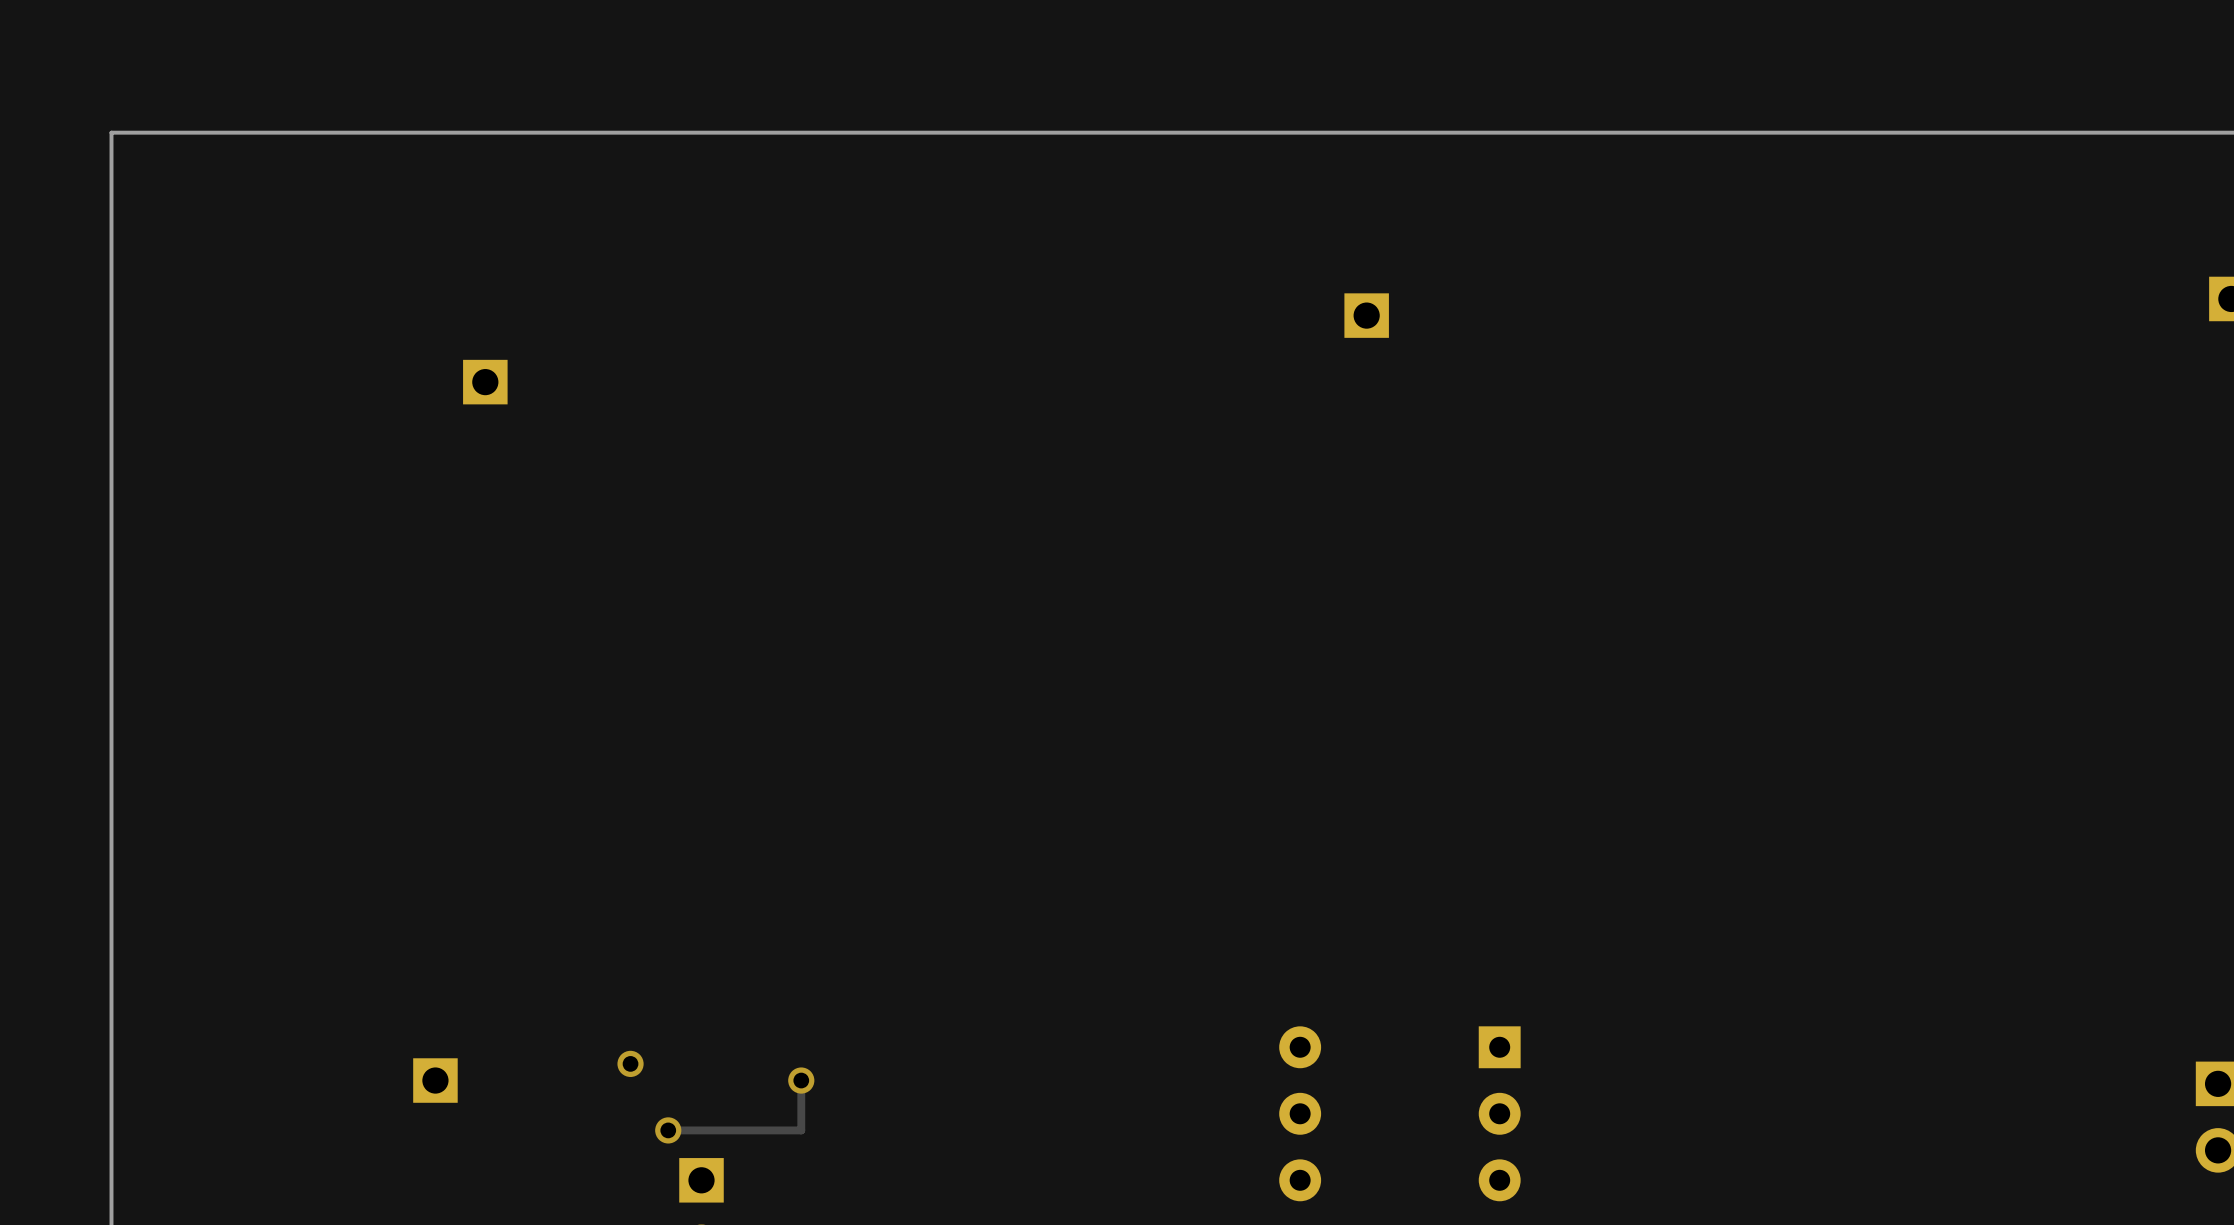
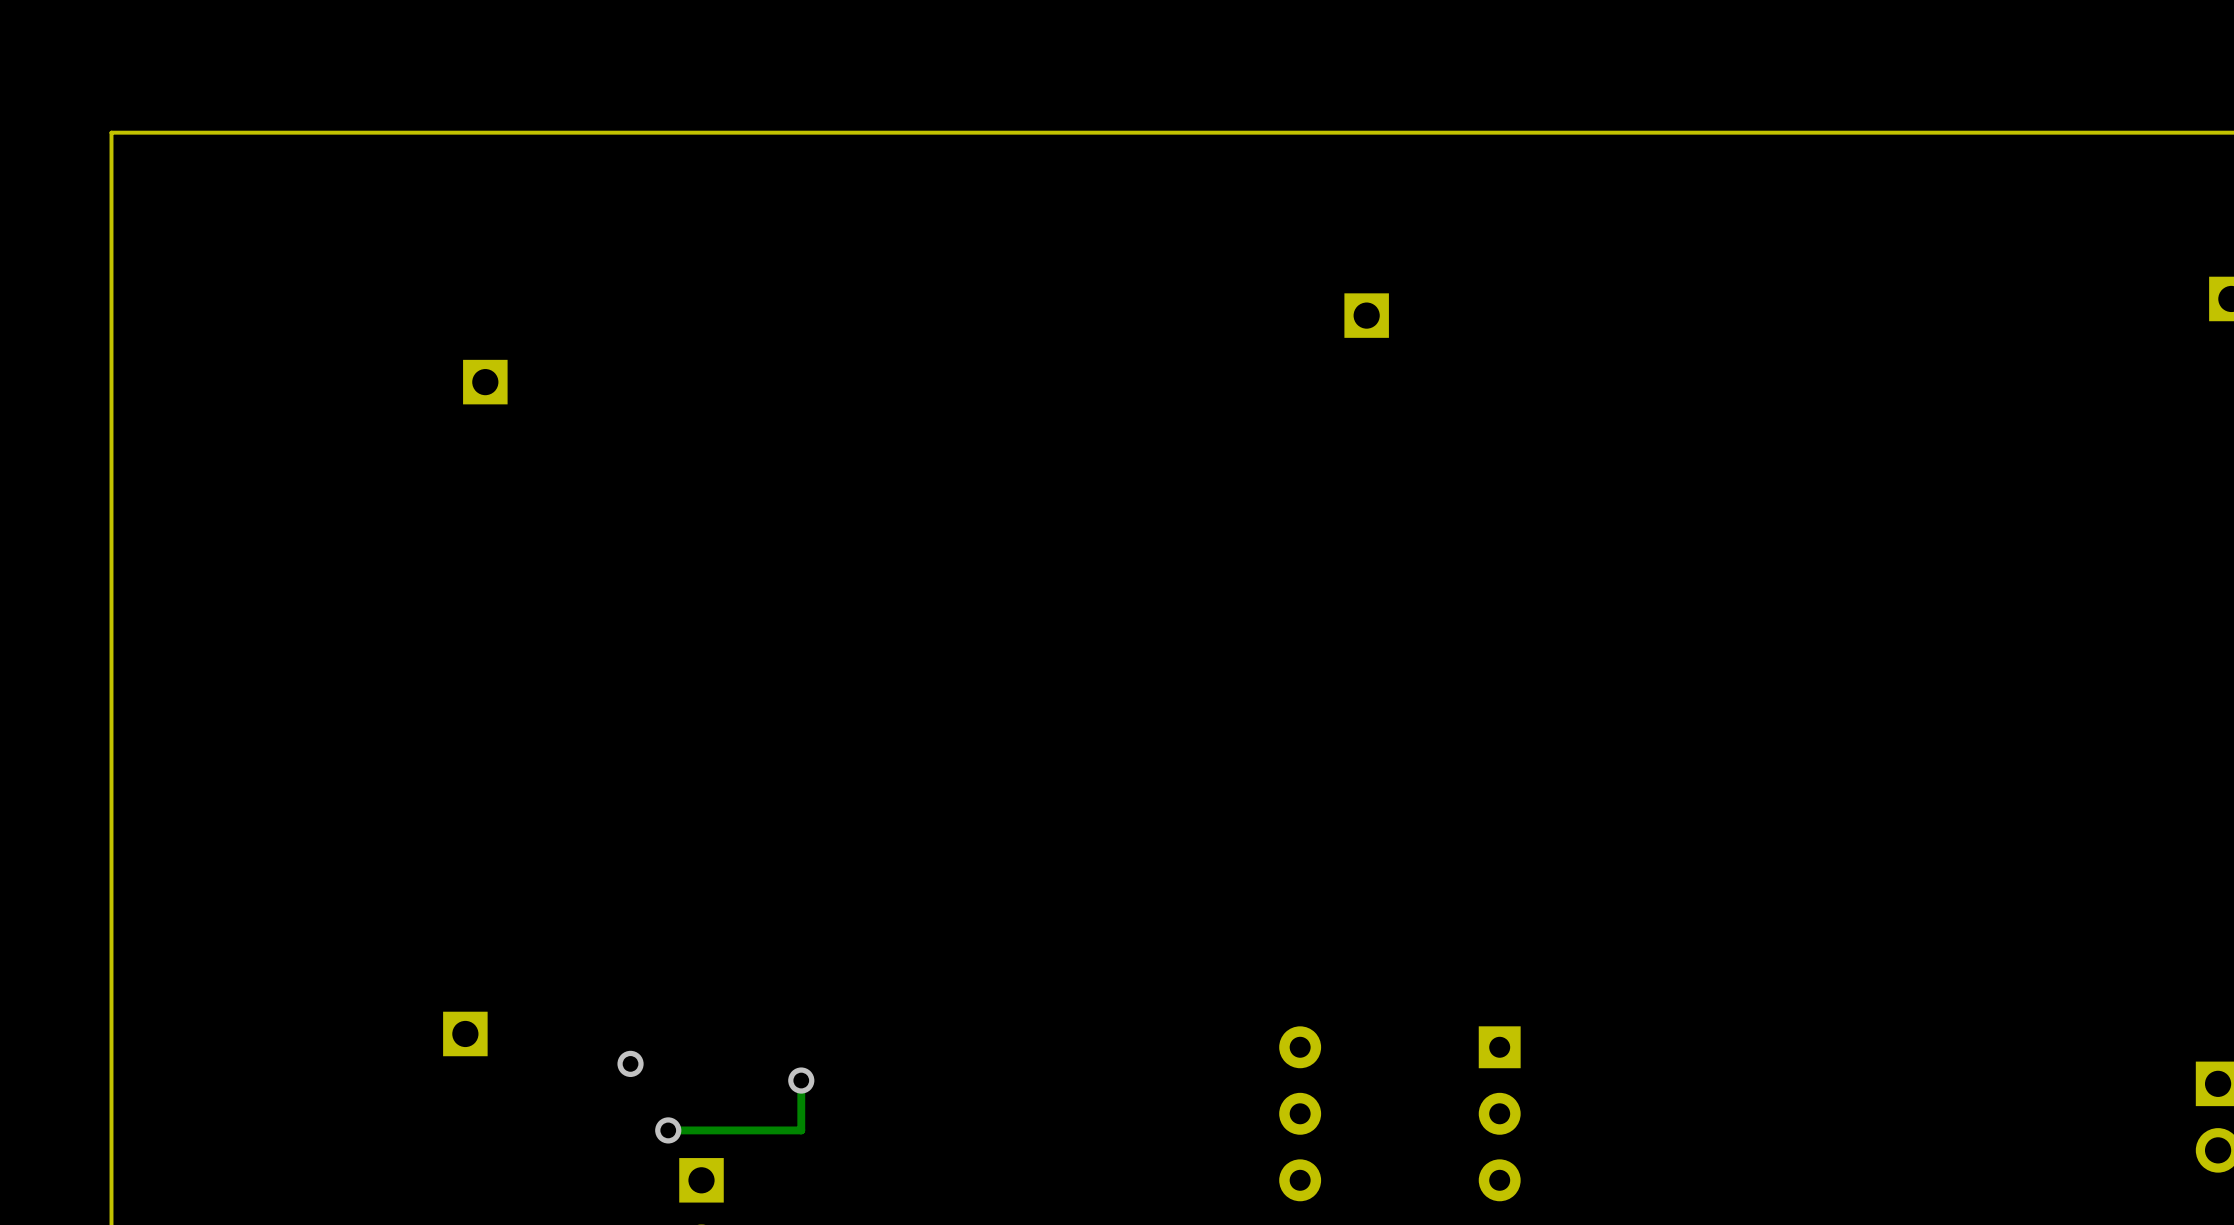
part position: (435, 1080) -> (465, 1033)

